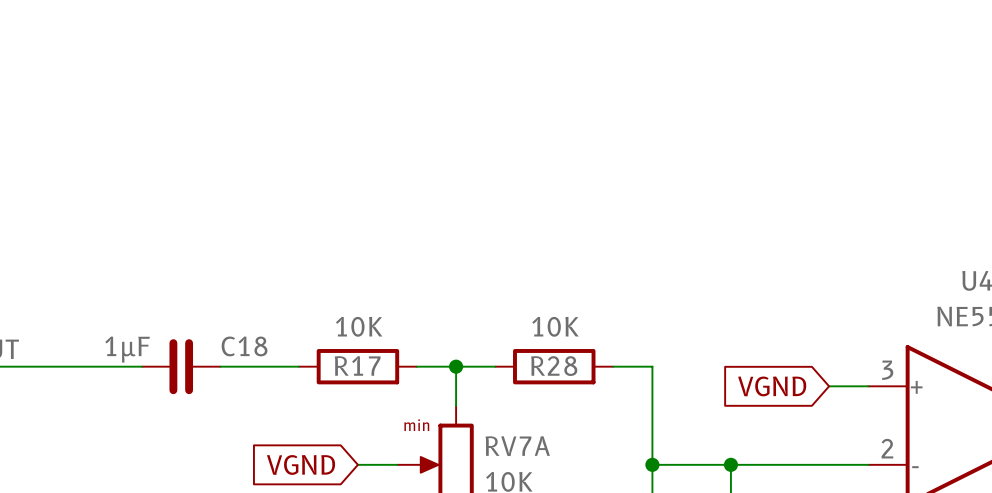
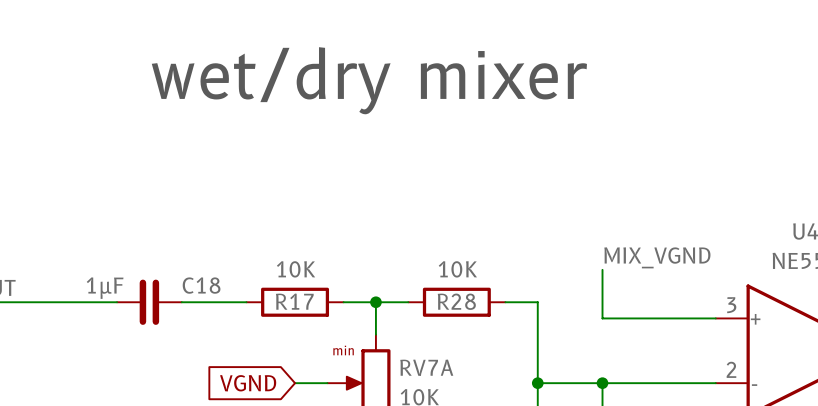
text: none -> wet/dry mixer (369, 80)
label: none -> MIX_VGND (657, 257)
wire: none -> (602, 269) (602, 318) (683, 318)
global label: VGND (772, 386) -> none

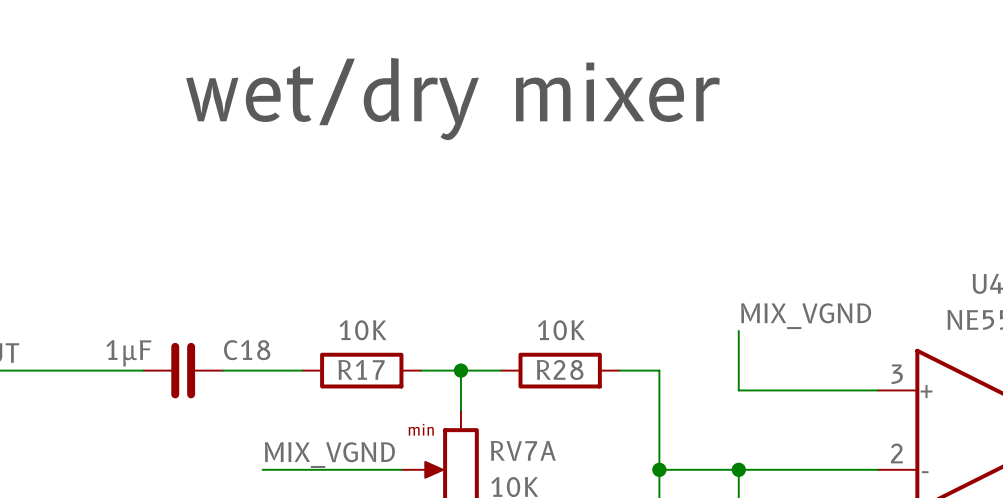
label: none -> MIX_VGND (329, 455)
wire: none -> (262, 469) (361, 469)
global label: VGND (248, 383) -> none

